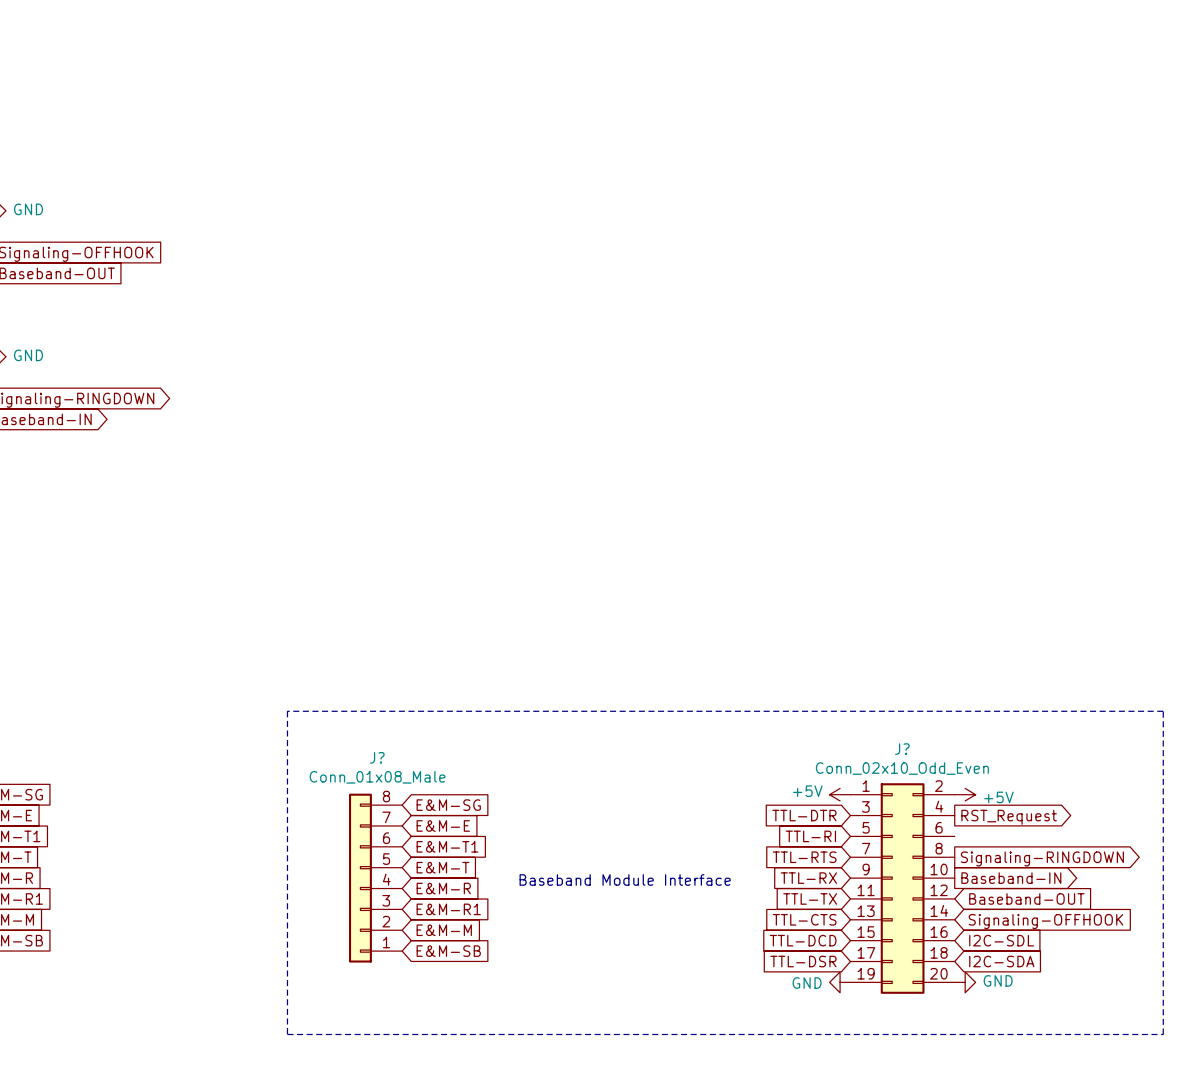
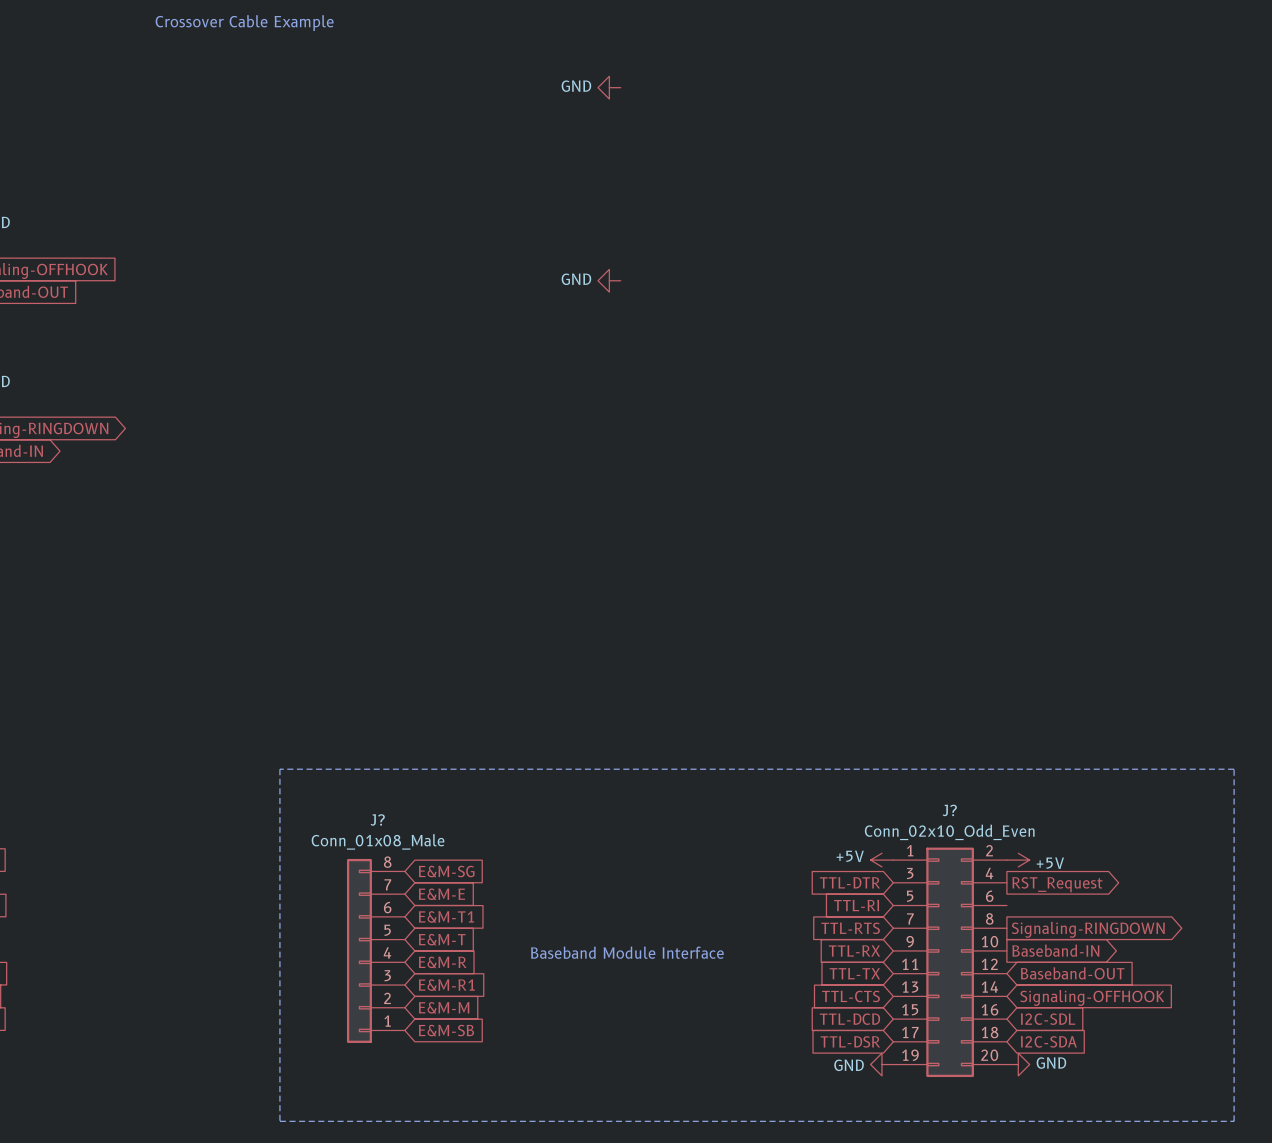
text: none -> Crossover Cable Example (244, 23)
power symbol: none -> GND (609, 87)
power symbol: none -> GND (609, 280)

